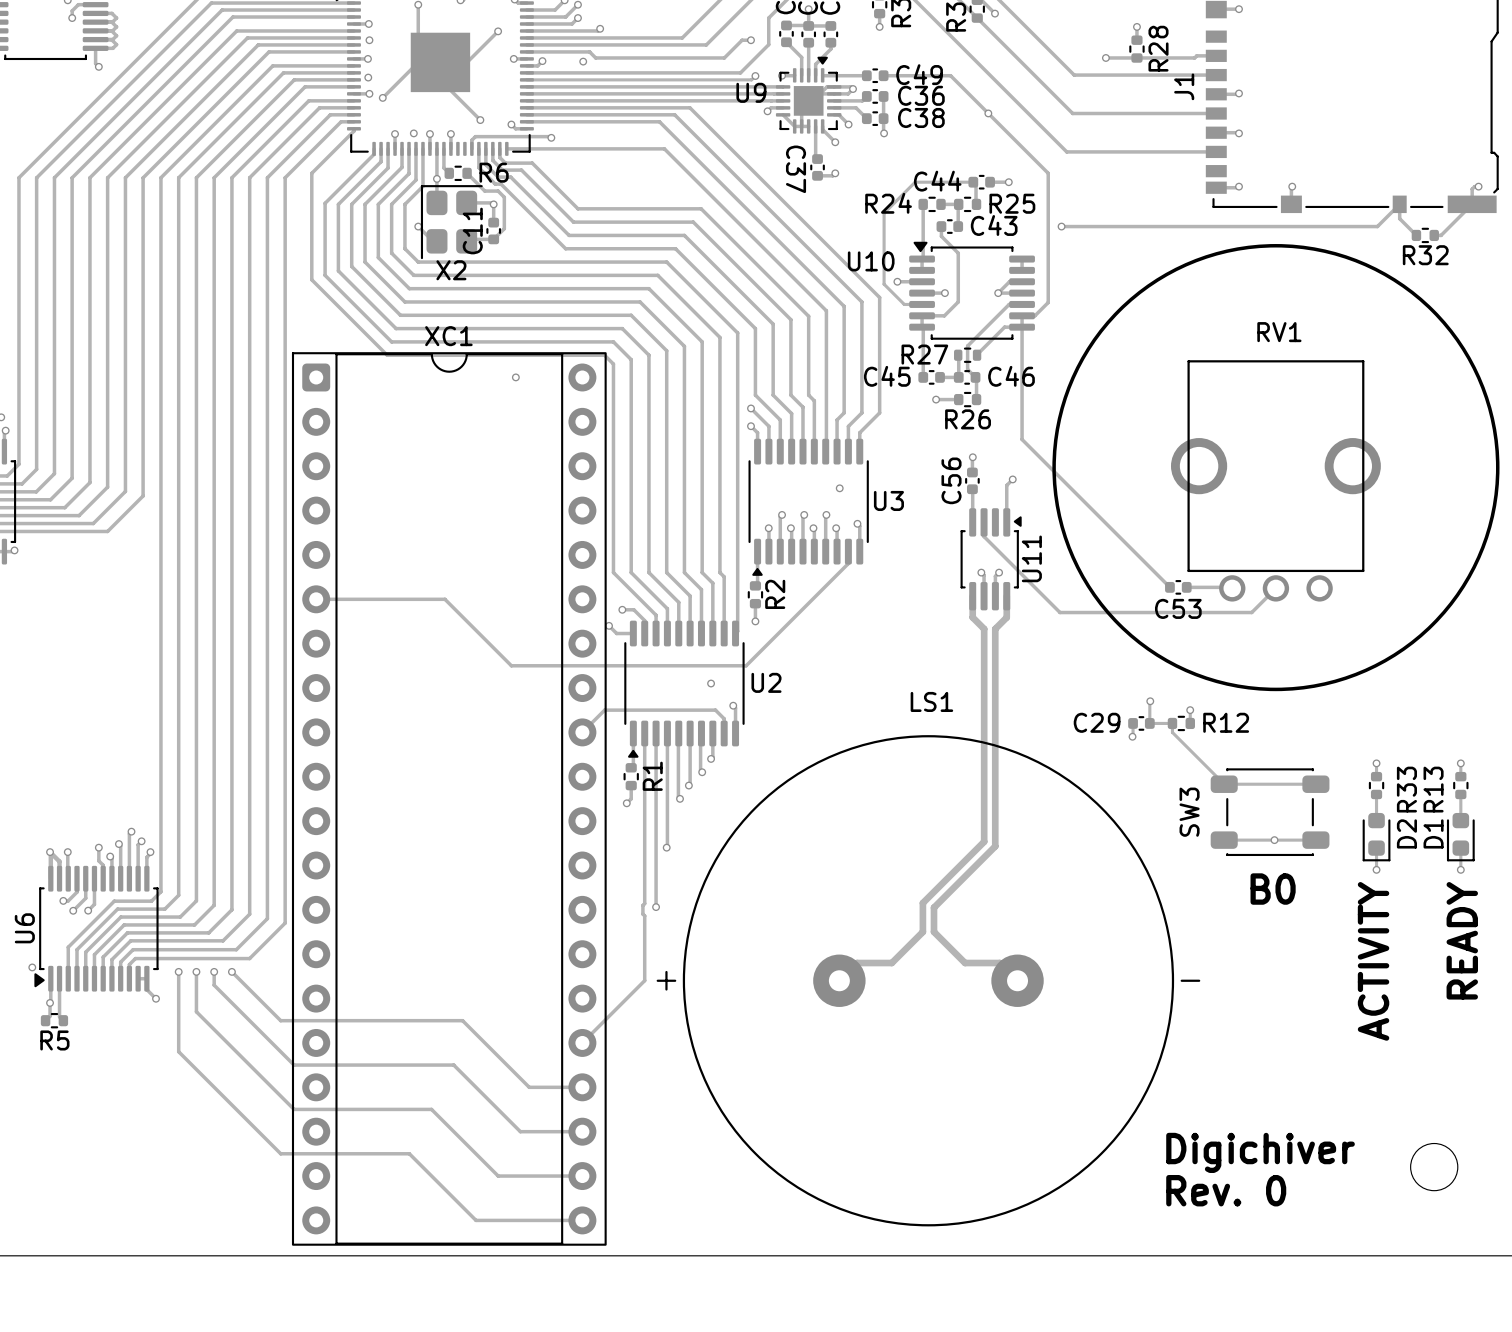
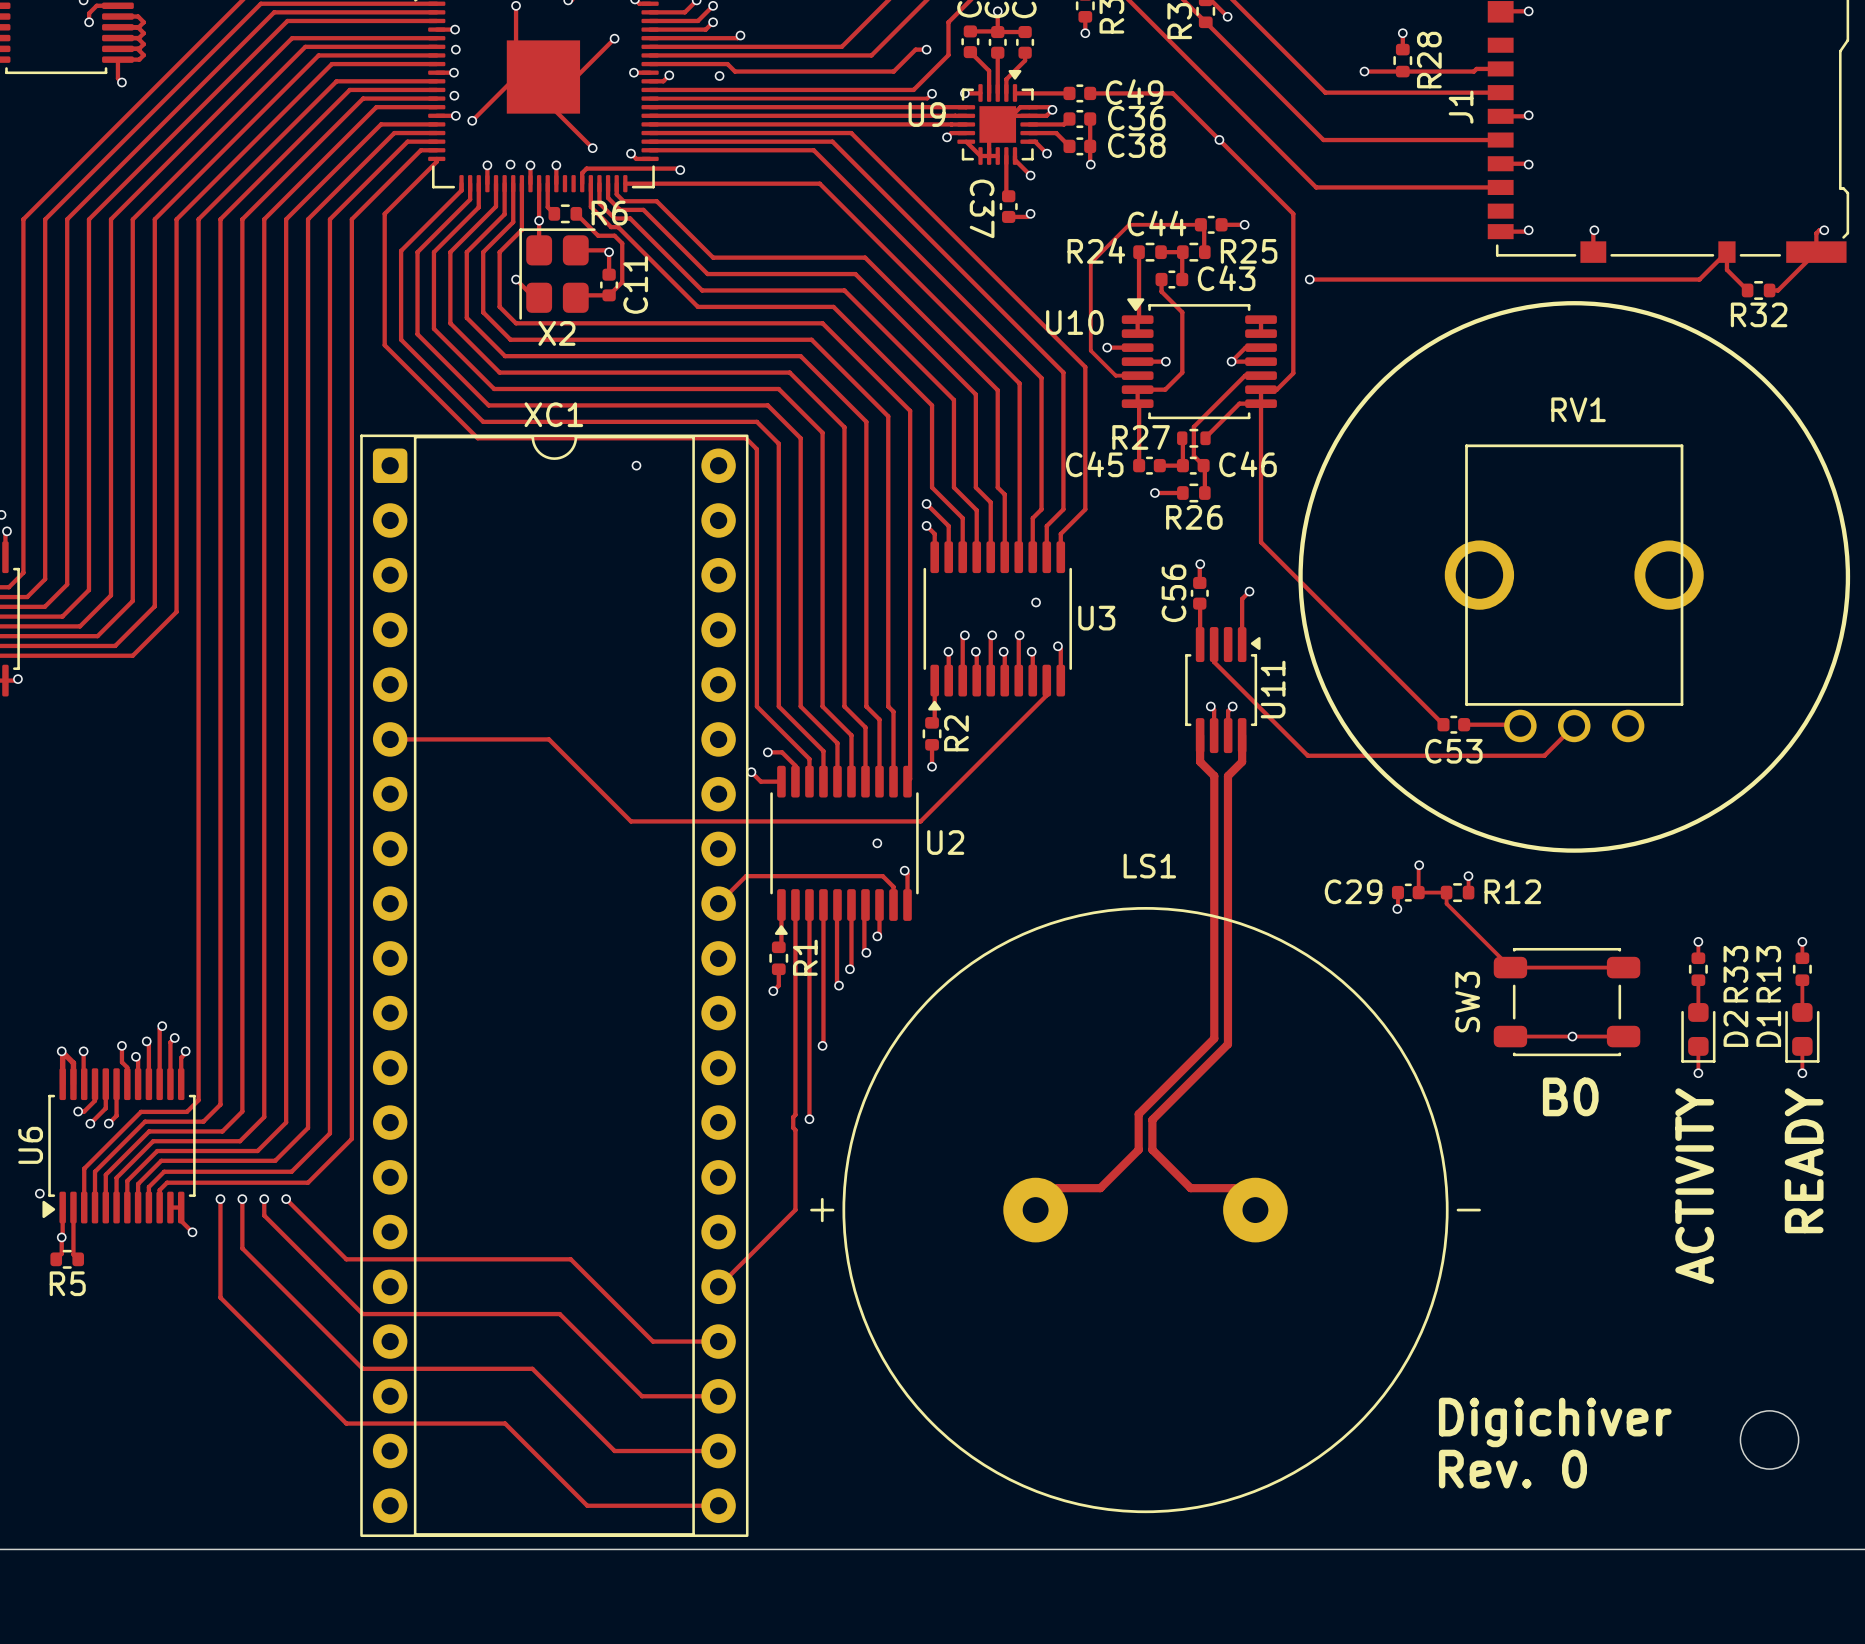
C11 name position: C11 (472, 231) -> C11 (635, 285)

